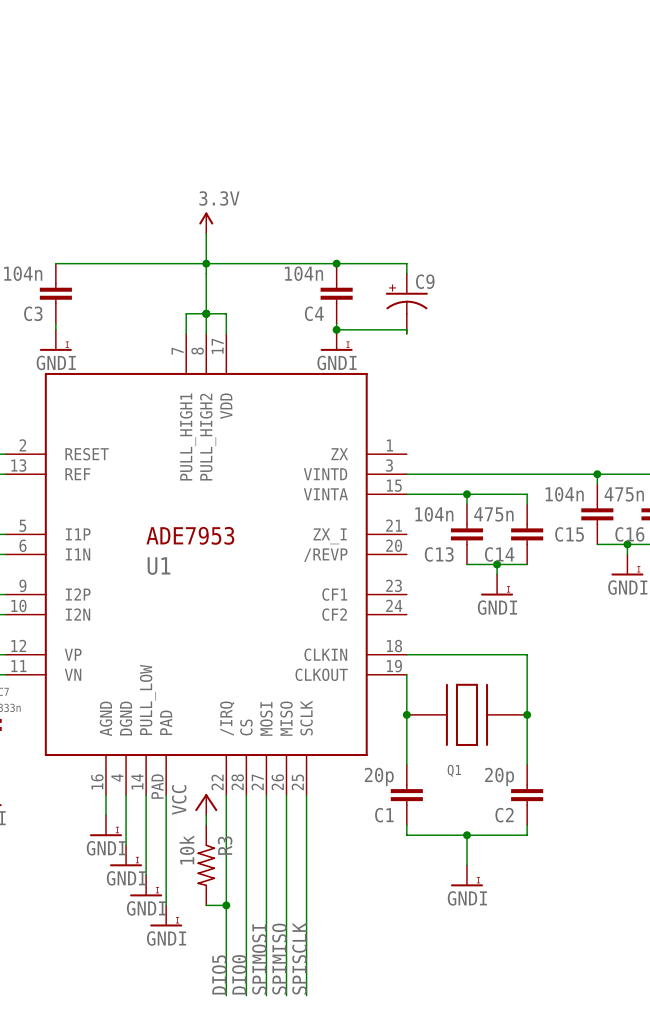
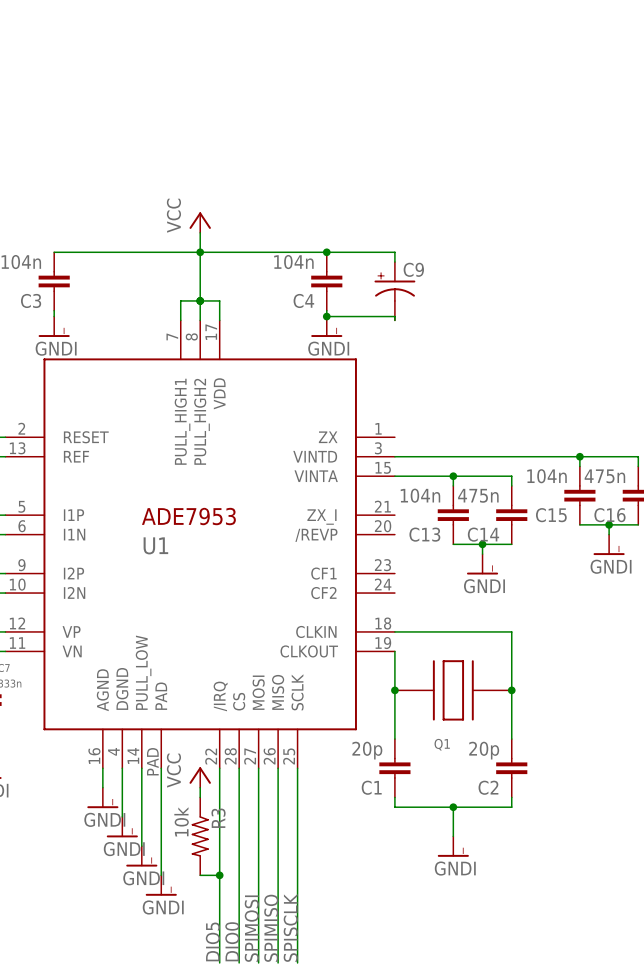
power symbol: 3.3V (206, 223) -> none
power symbol: none -> VCC (200, 222)

